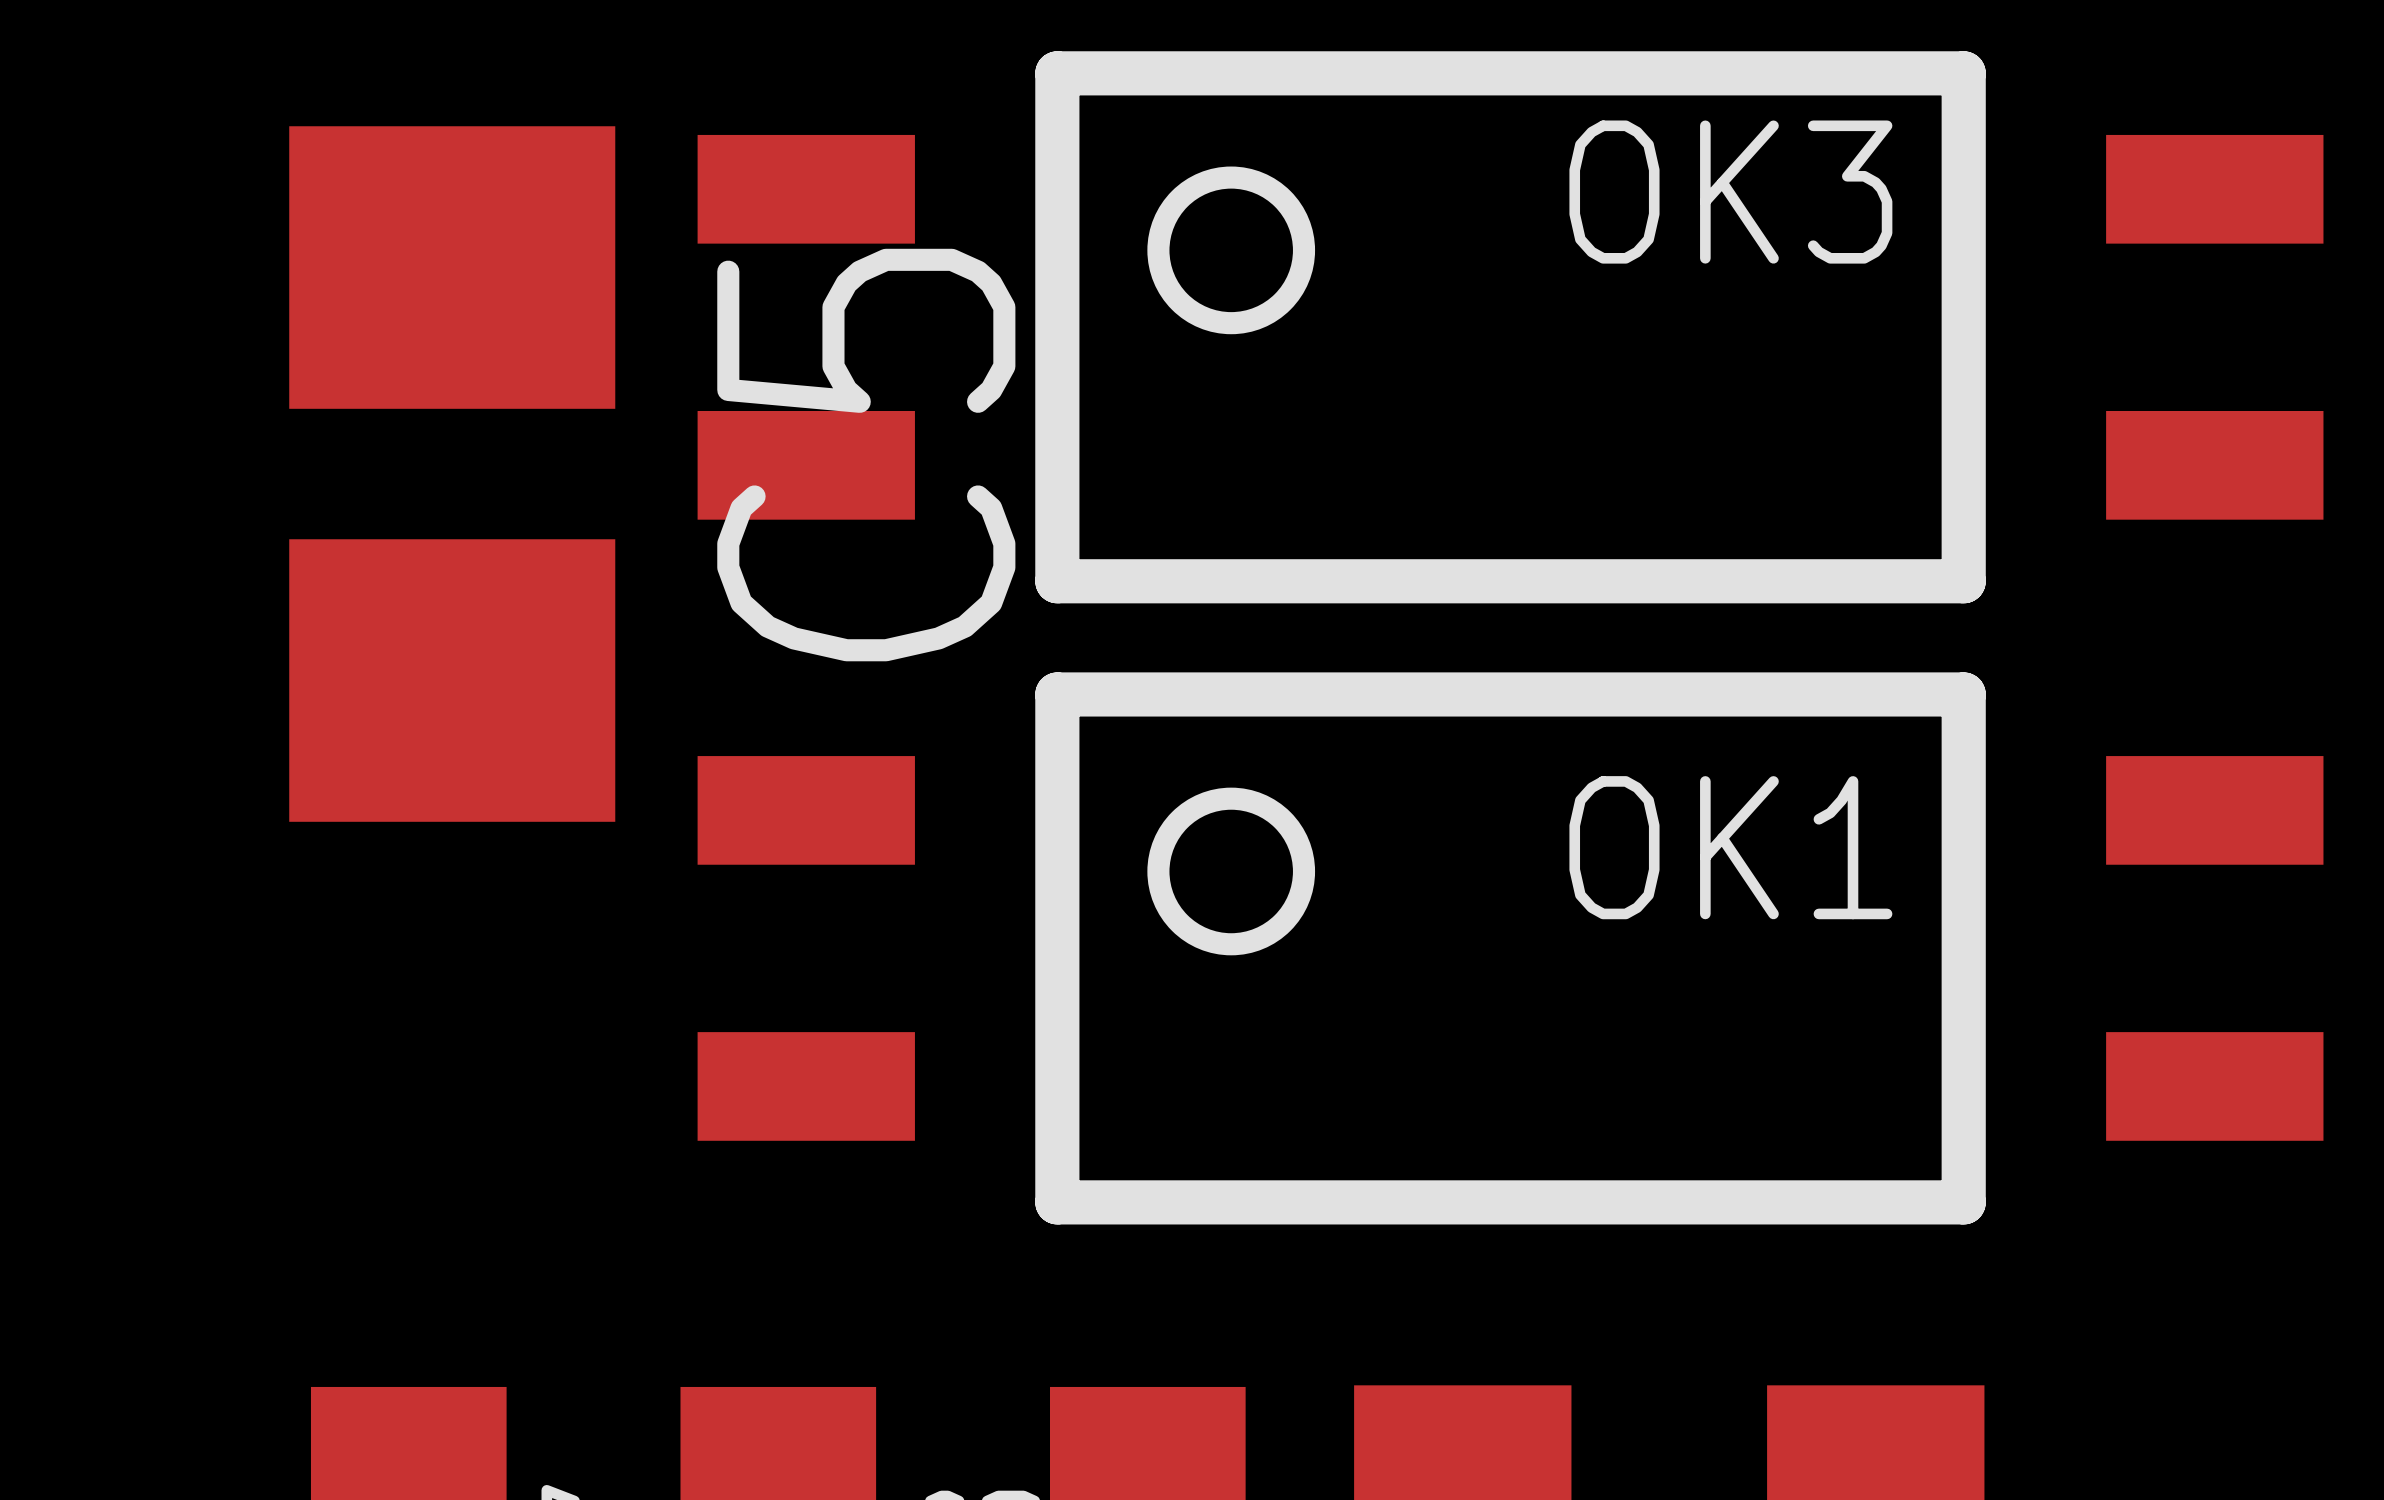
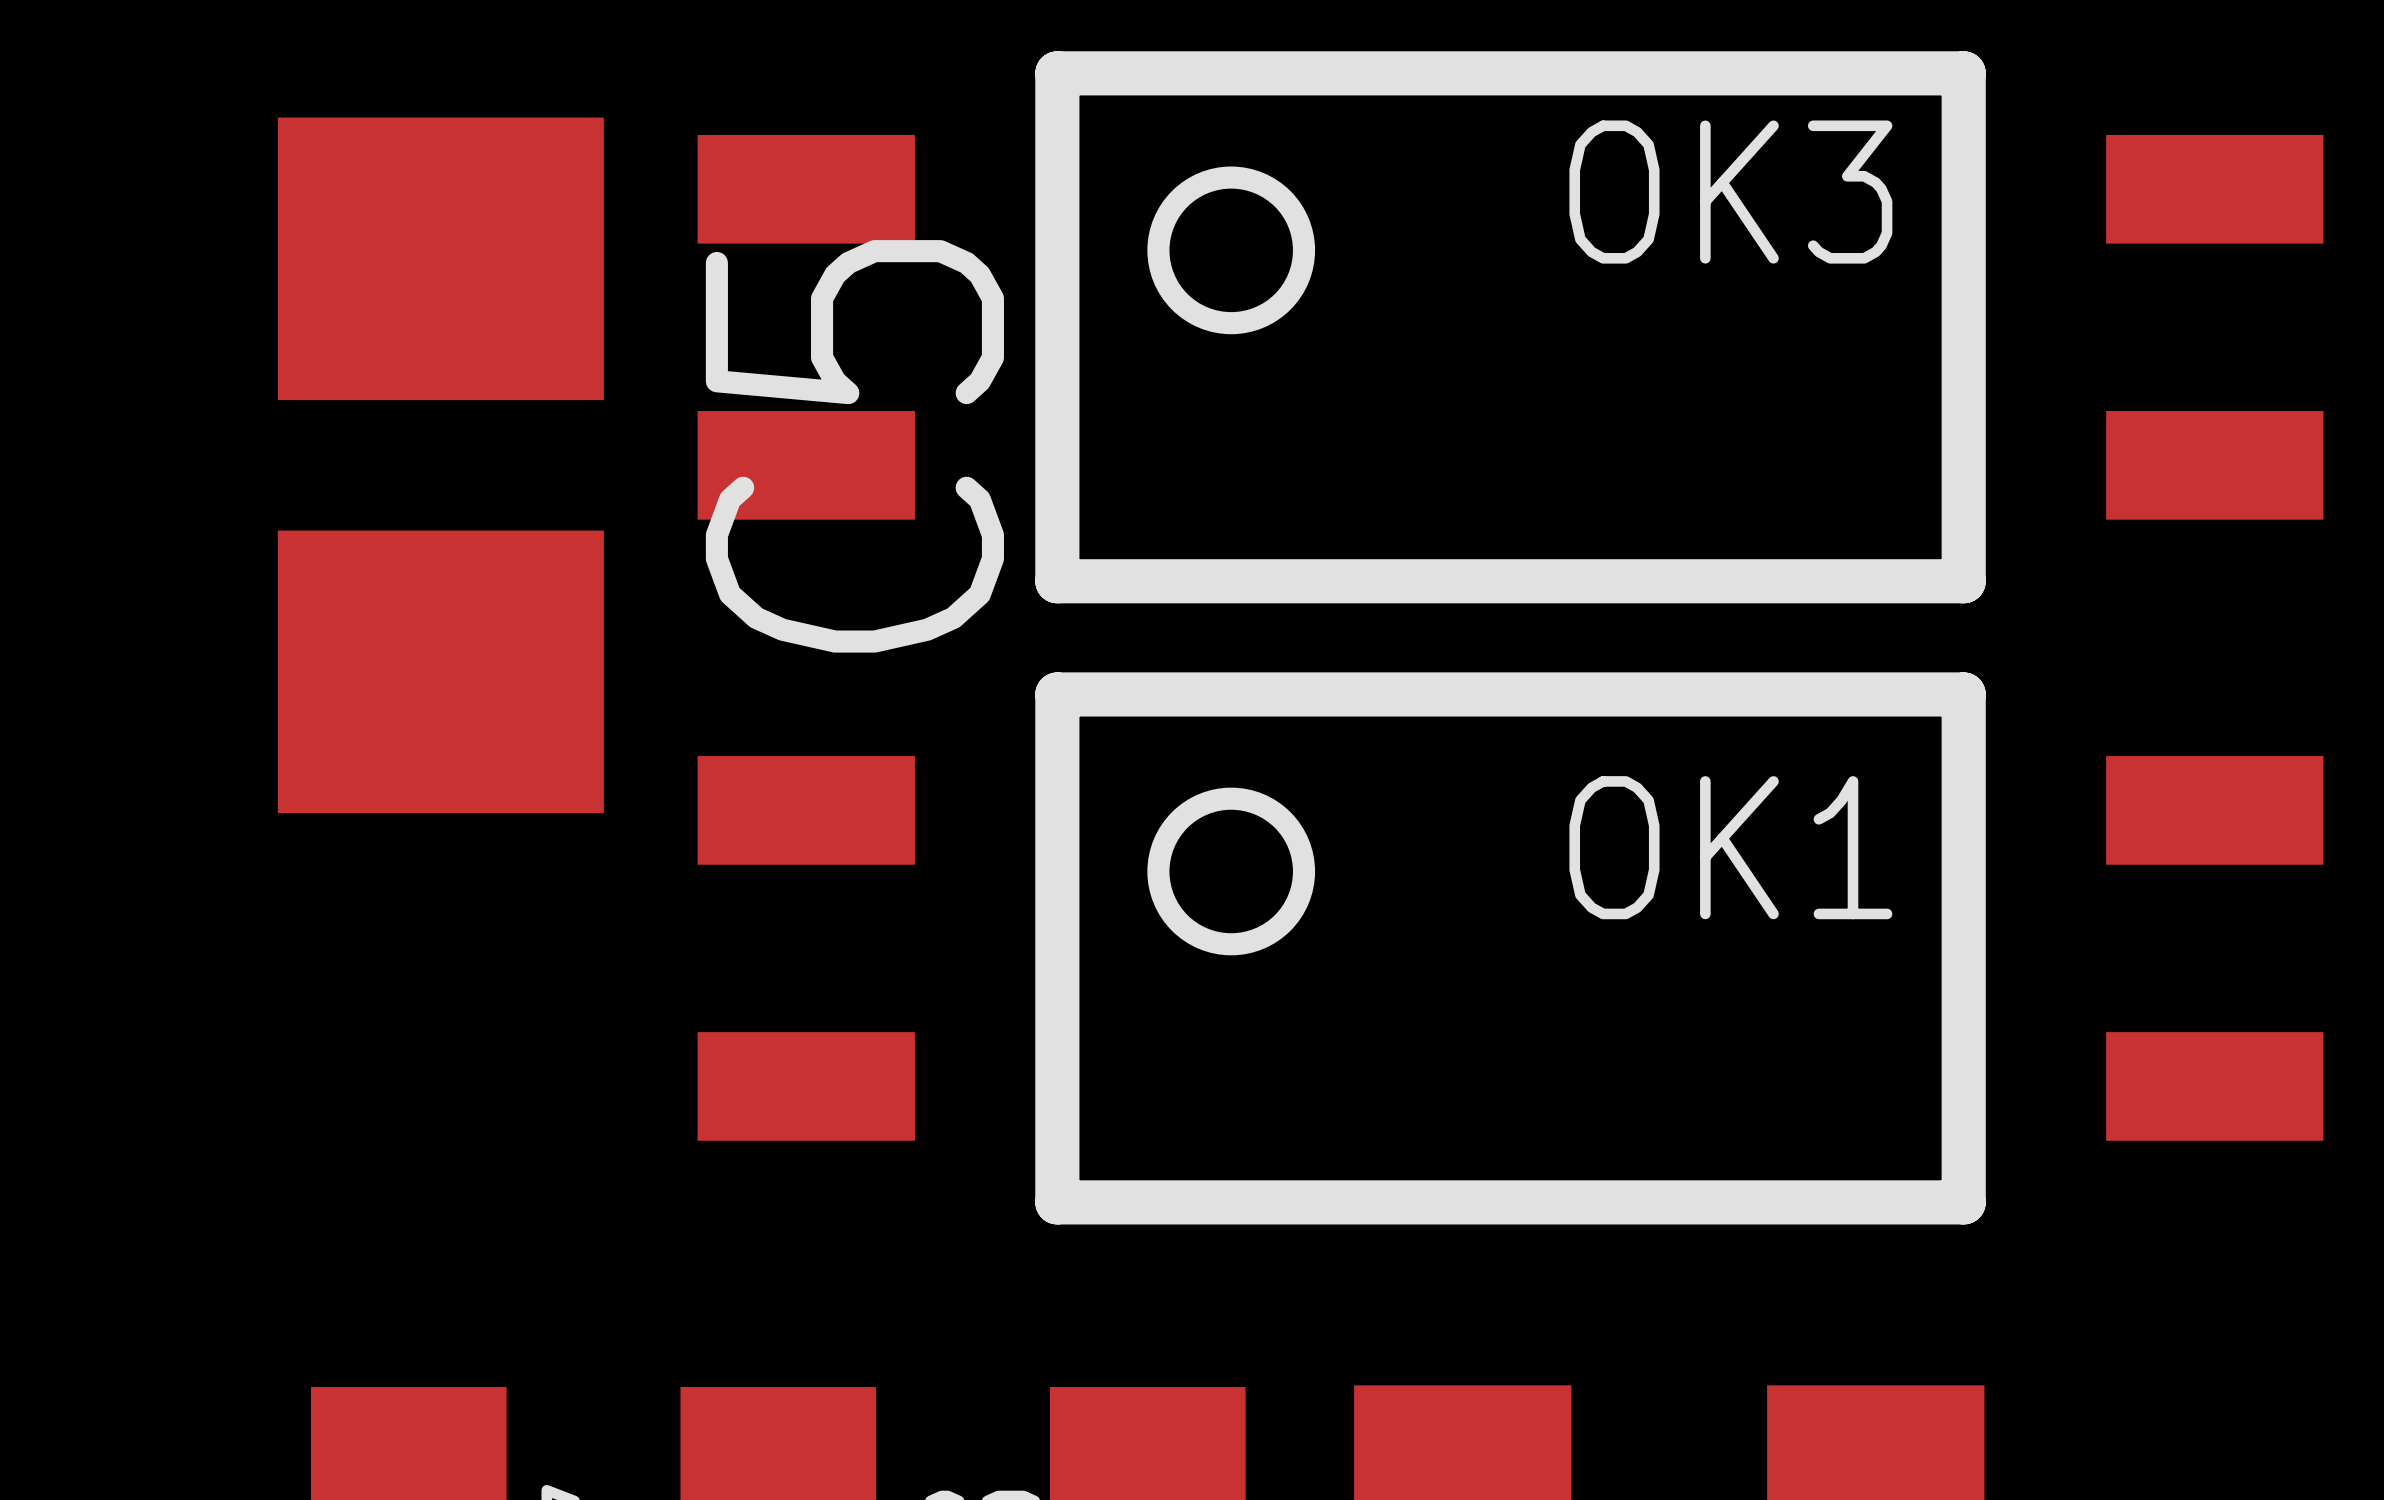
C5 position: (452, 474) -> (440, 465)

